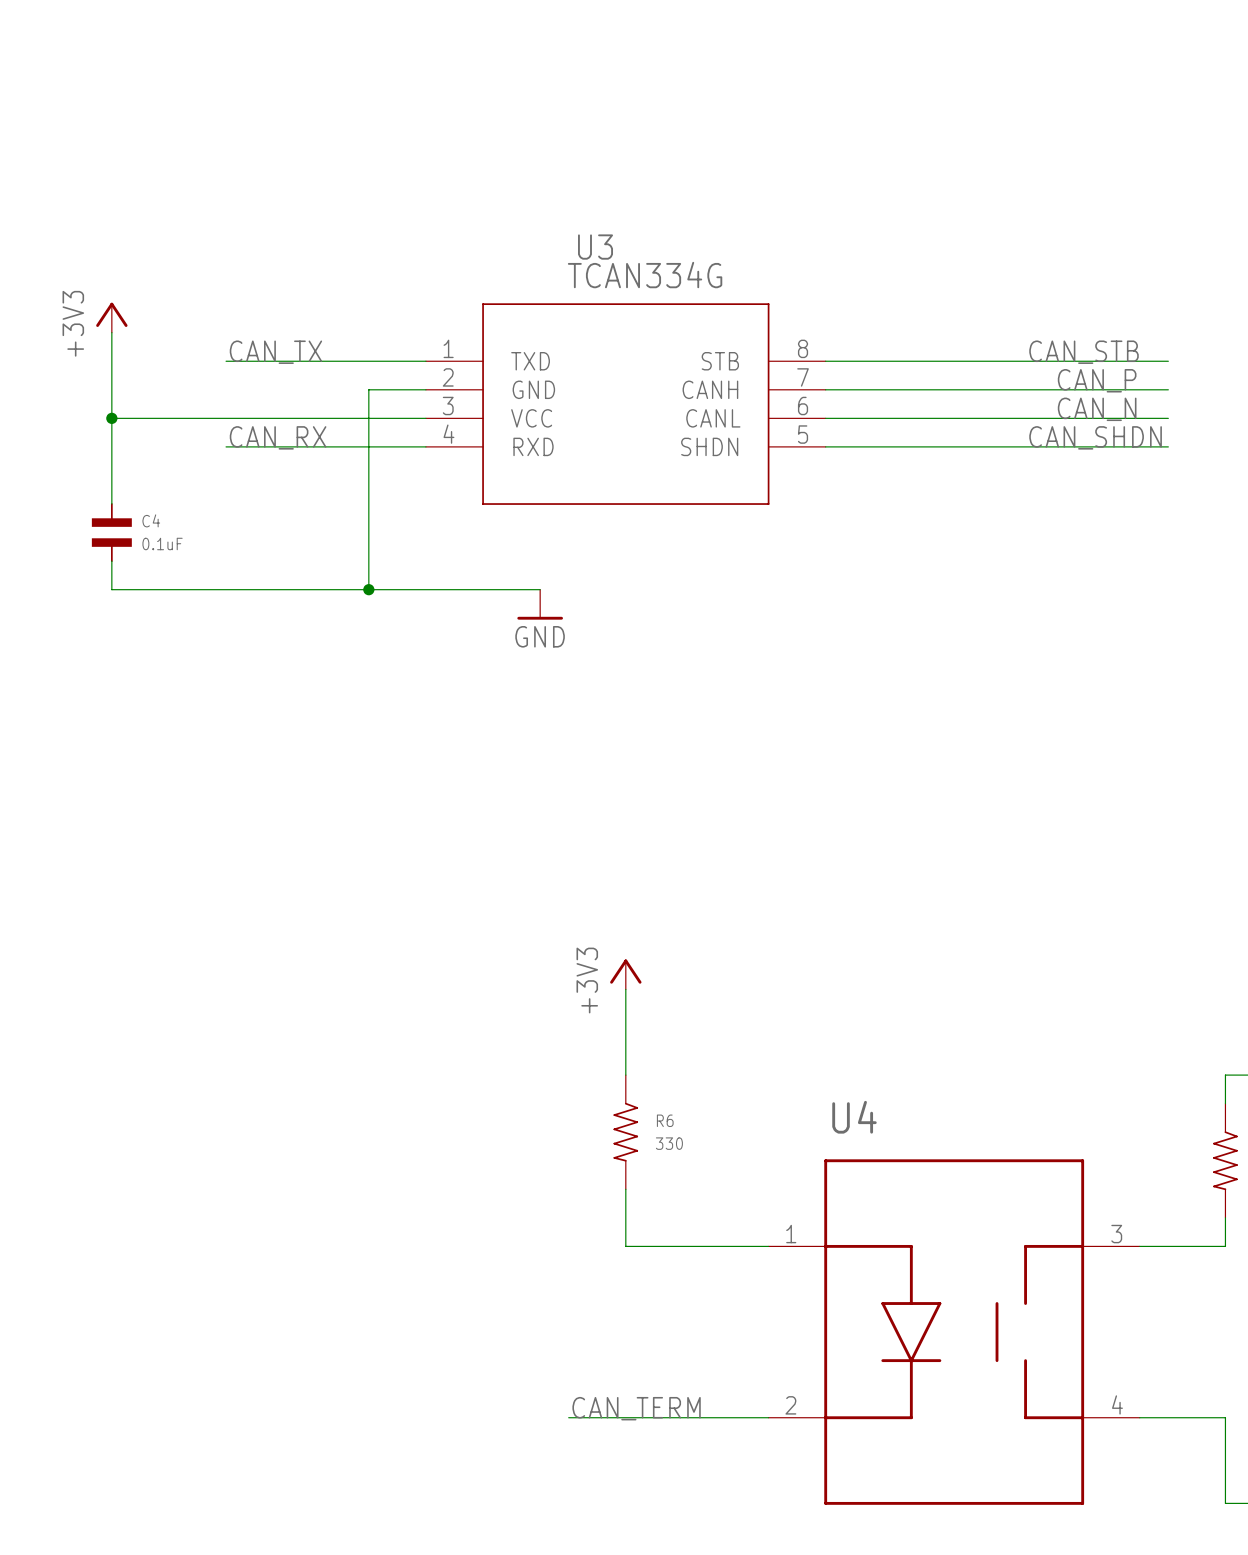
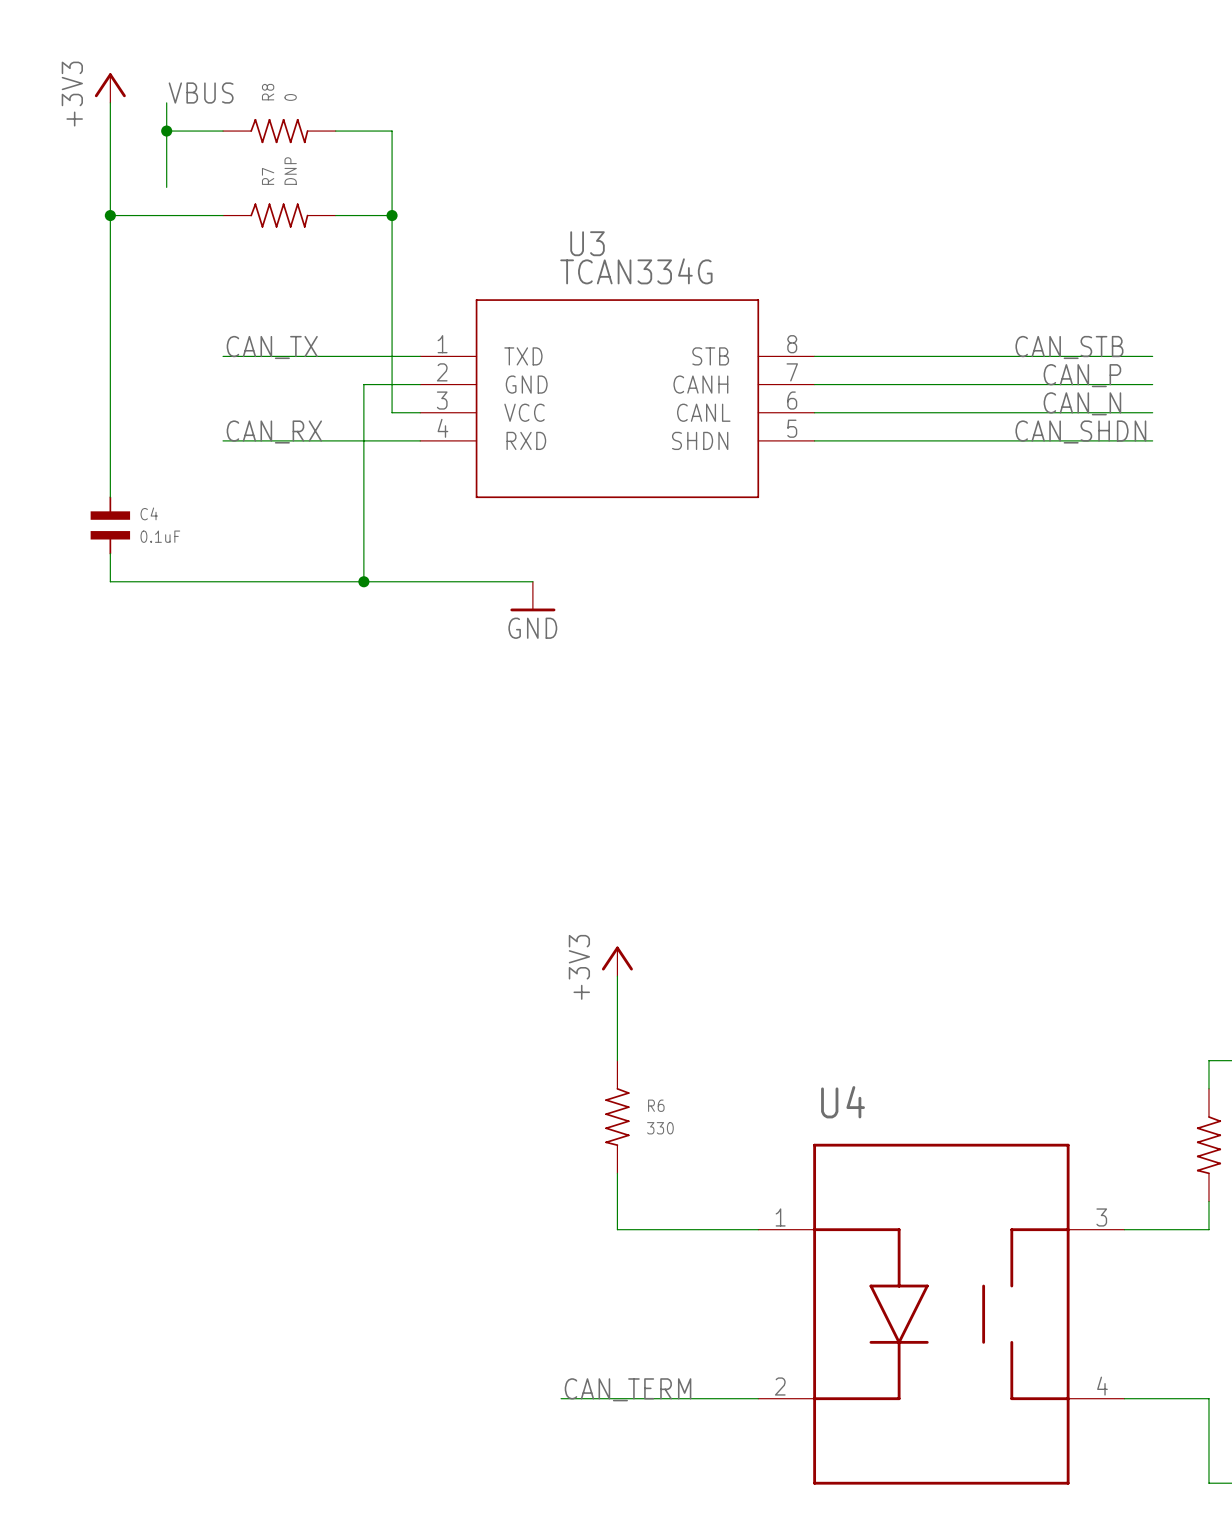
label: none -> VBUS (201, 93)
wire: none -> (110, 102) (110, 328)
wire: none -> (166, 102) (166, 187)
wire: none -> (166, 131) (223, 131)
junction: none -> (166, 131)
R8: none -> 0 (279, 131)
wire: none -> (110, 215) (223, 215)
junction: none -> (110, 215)
R7: none -> DNP (279, 215)
wire: none -> (335, 215) (392, 215)
junction: none -> (392, 215)
power symbol position: +3V3 (111, 317) -> +3V3 (110, 88)
wire: (111, 418) (397, 418) -> (335, 131) (392, 131) (392, 412)
junction: (111, 418) -> none

